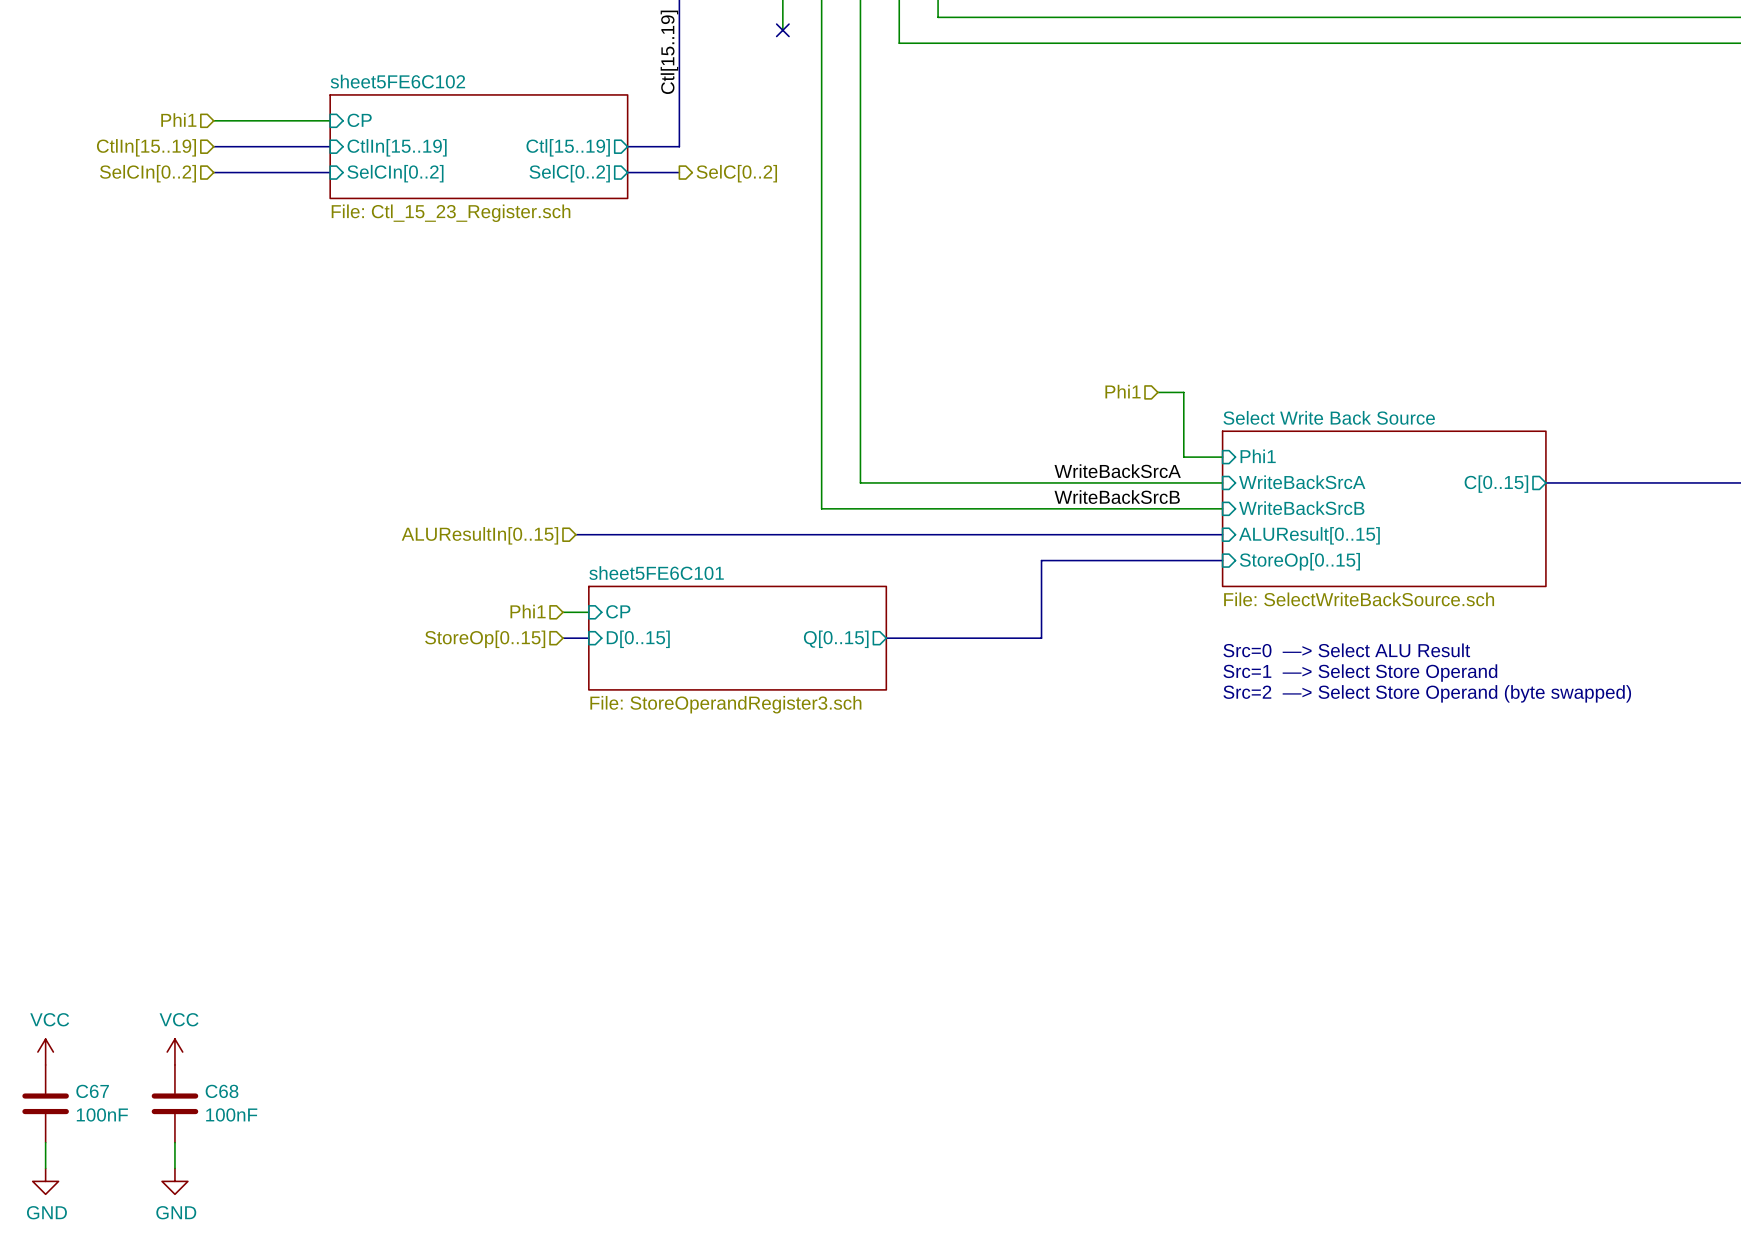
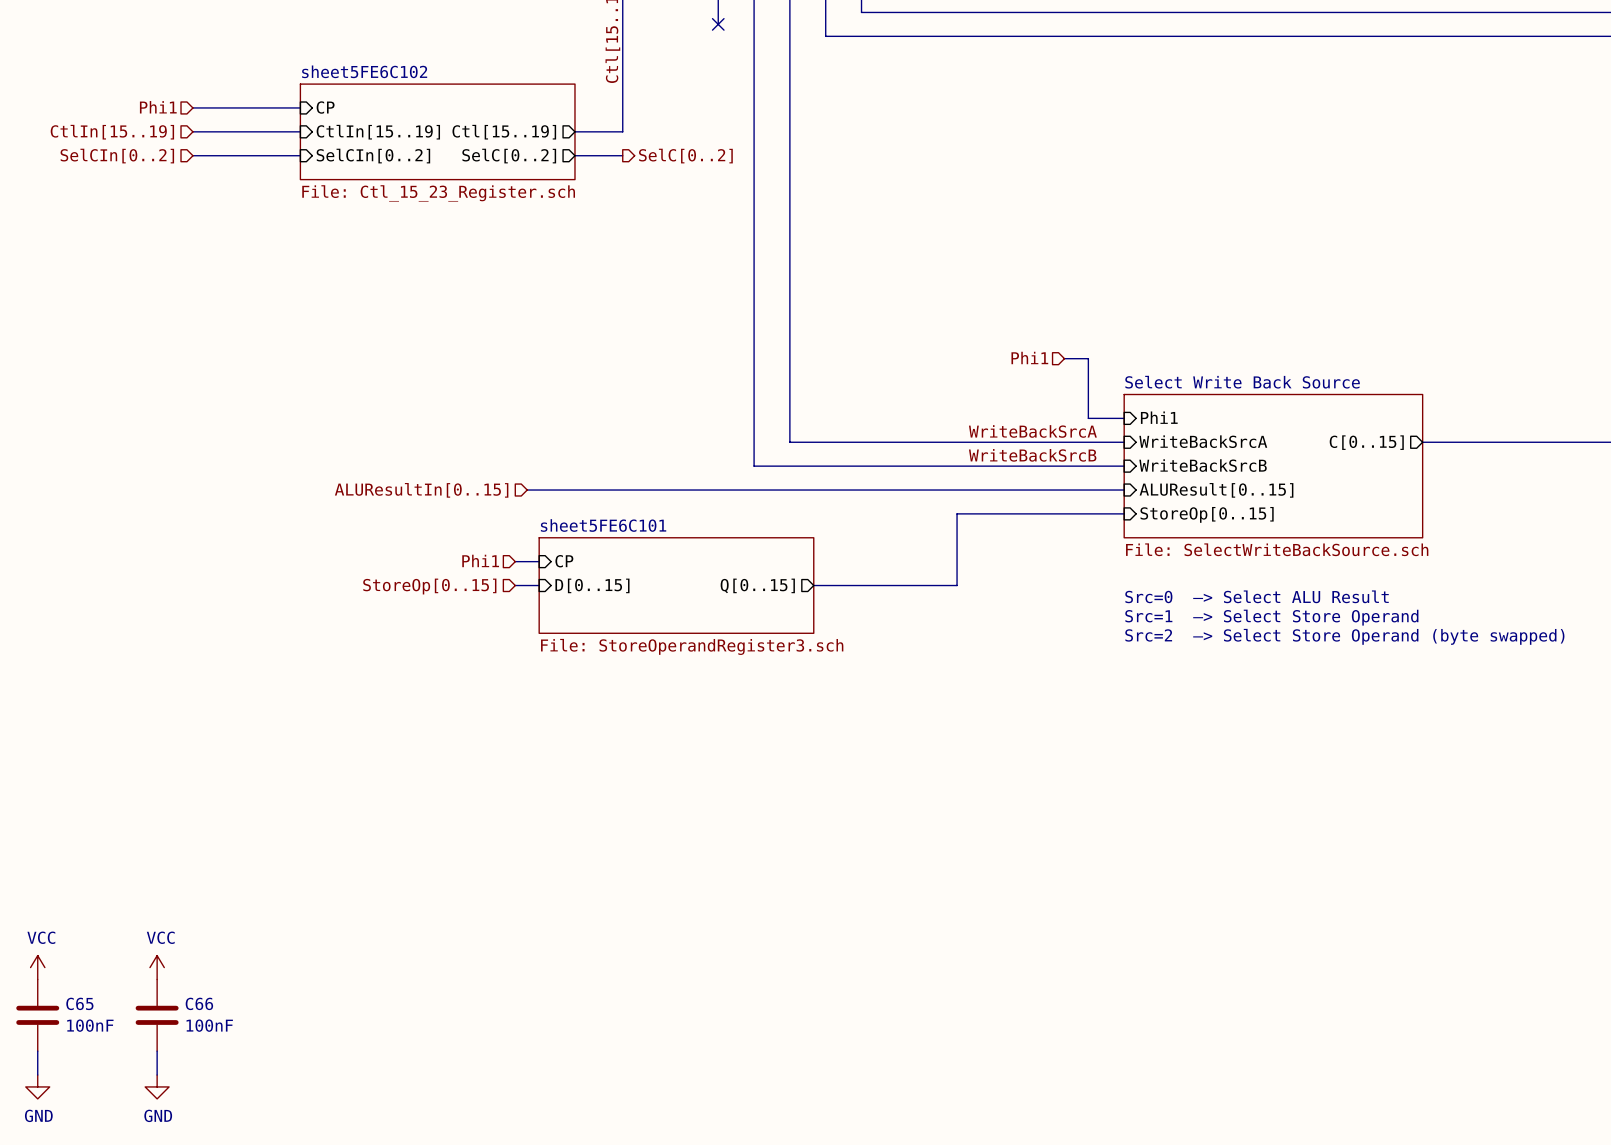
C67 name: C67 (92, 1091) -> C65 (79, 1003)
C68 name: C68 (222, 1091) -> C66 (199, 1003)

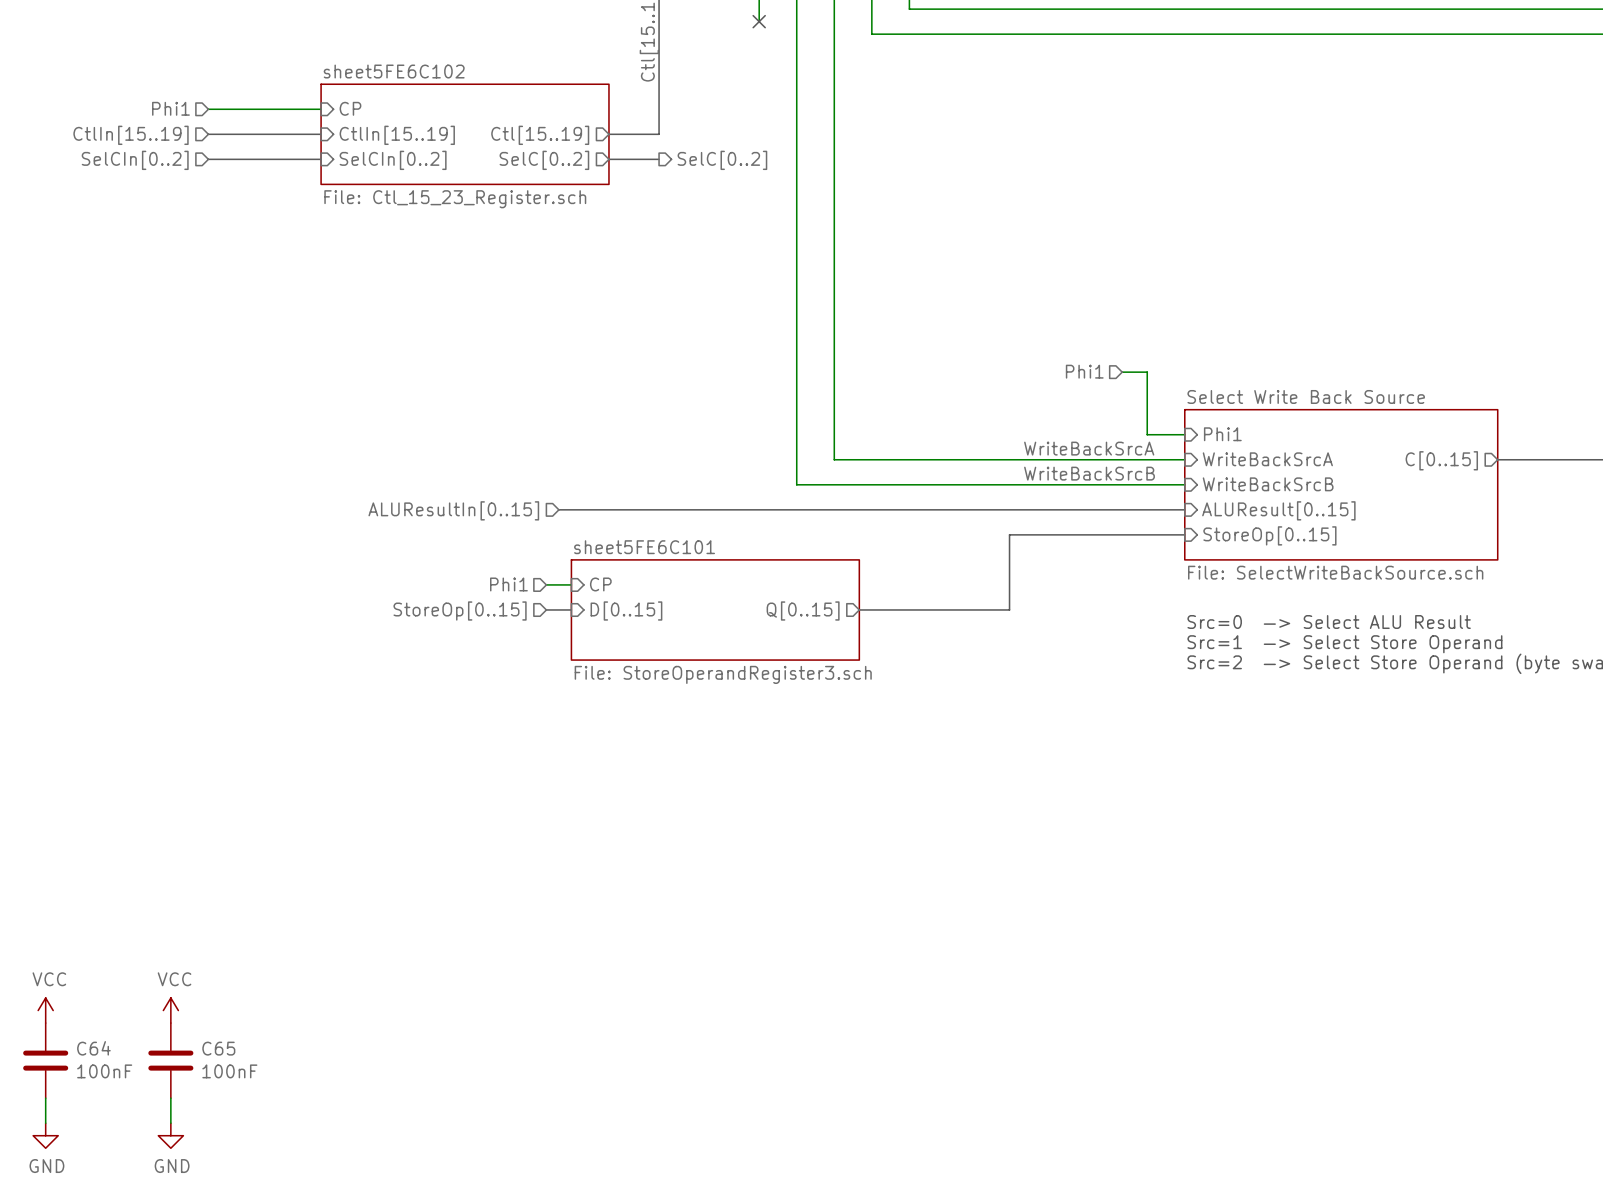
C65 name: C65 (79, 1003) -> C64 (93, 1048)
C66 name: C66 (199, 1003) -> C65 (218, 1048)

